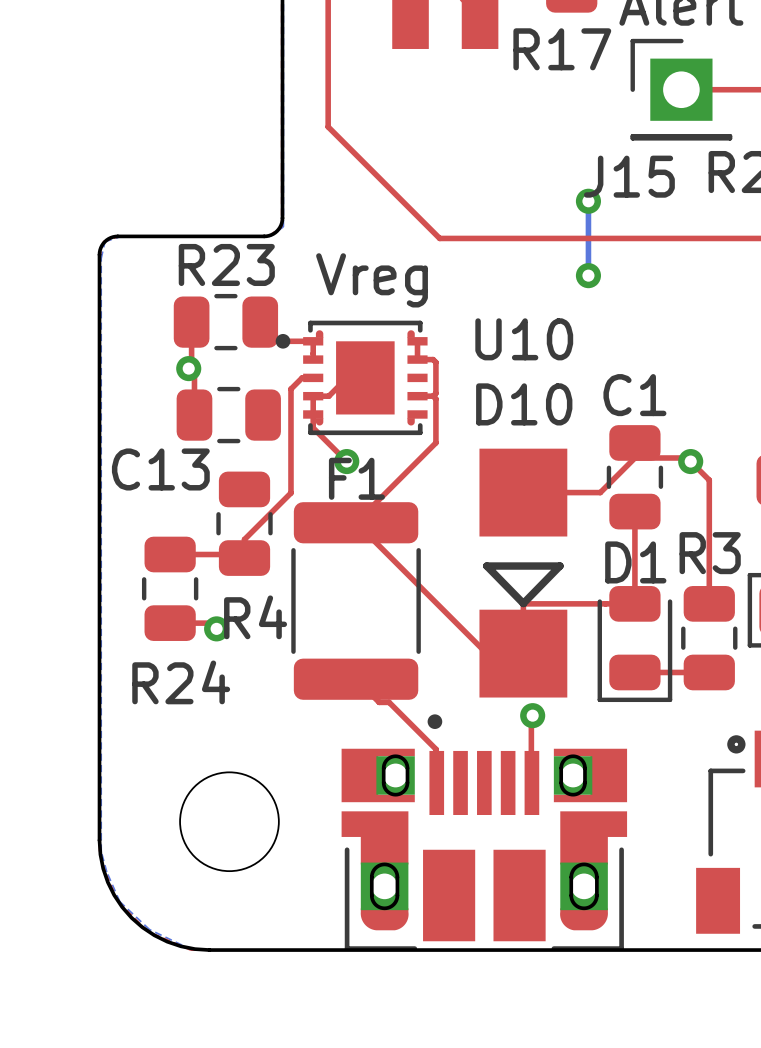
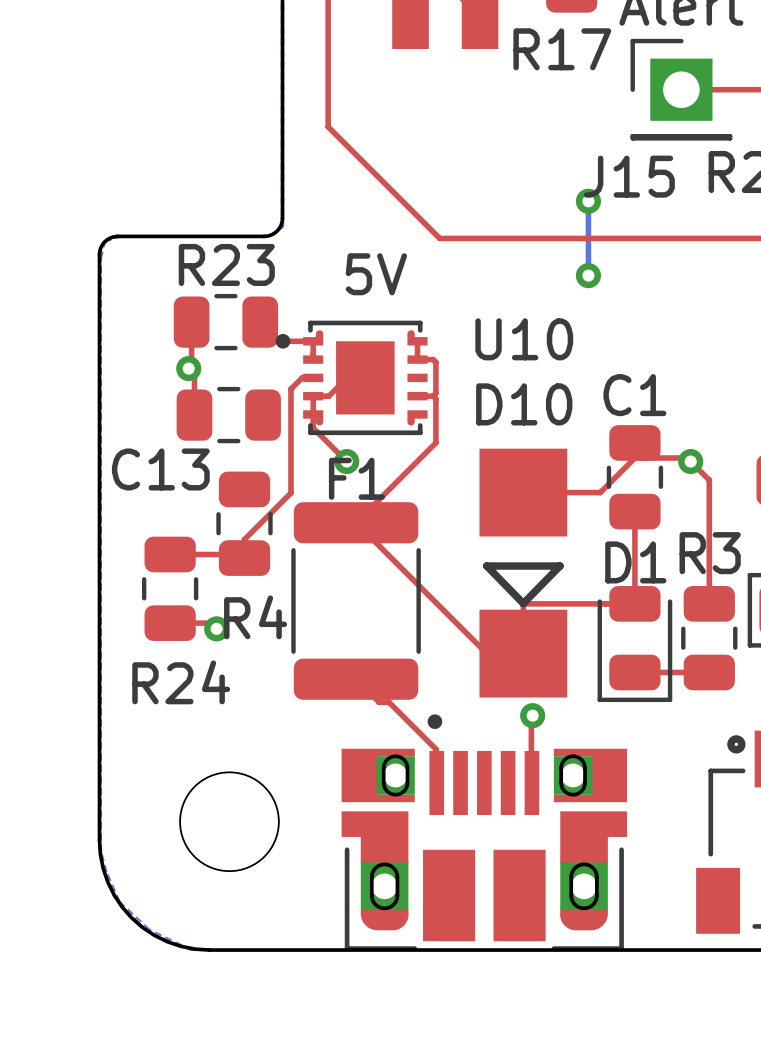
U10 value: Vreg (372, 280) -> 5V (376, 274)

